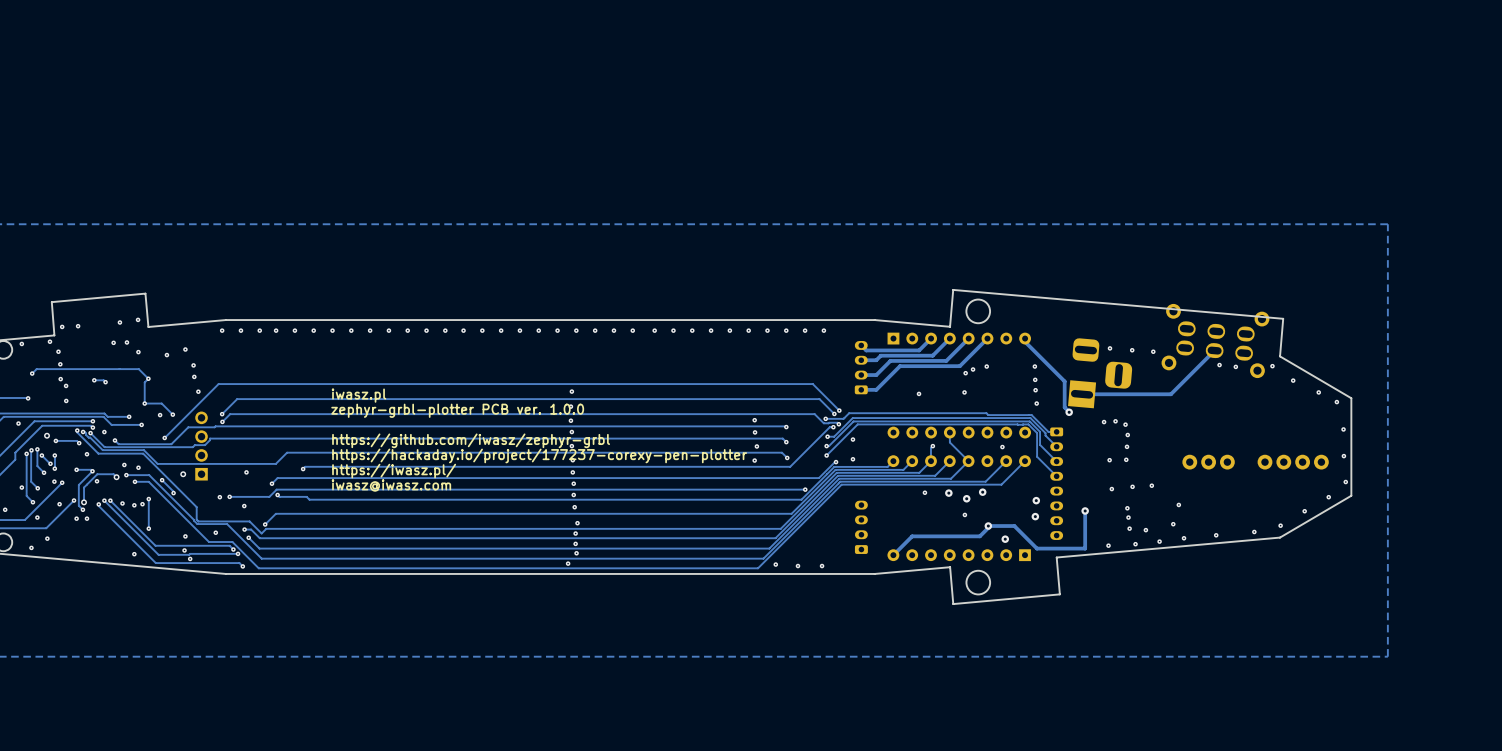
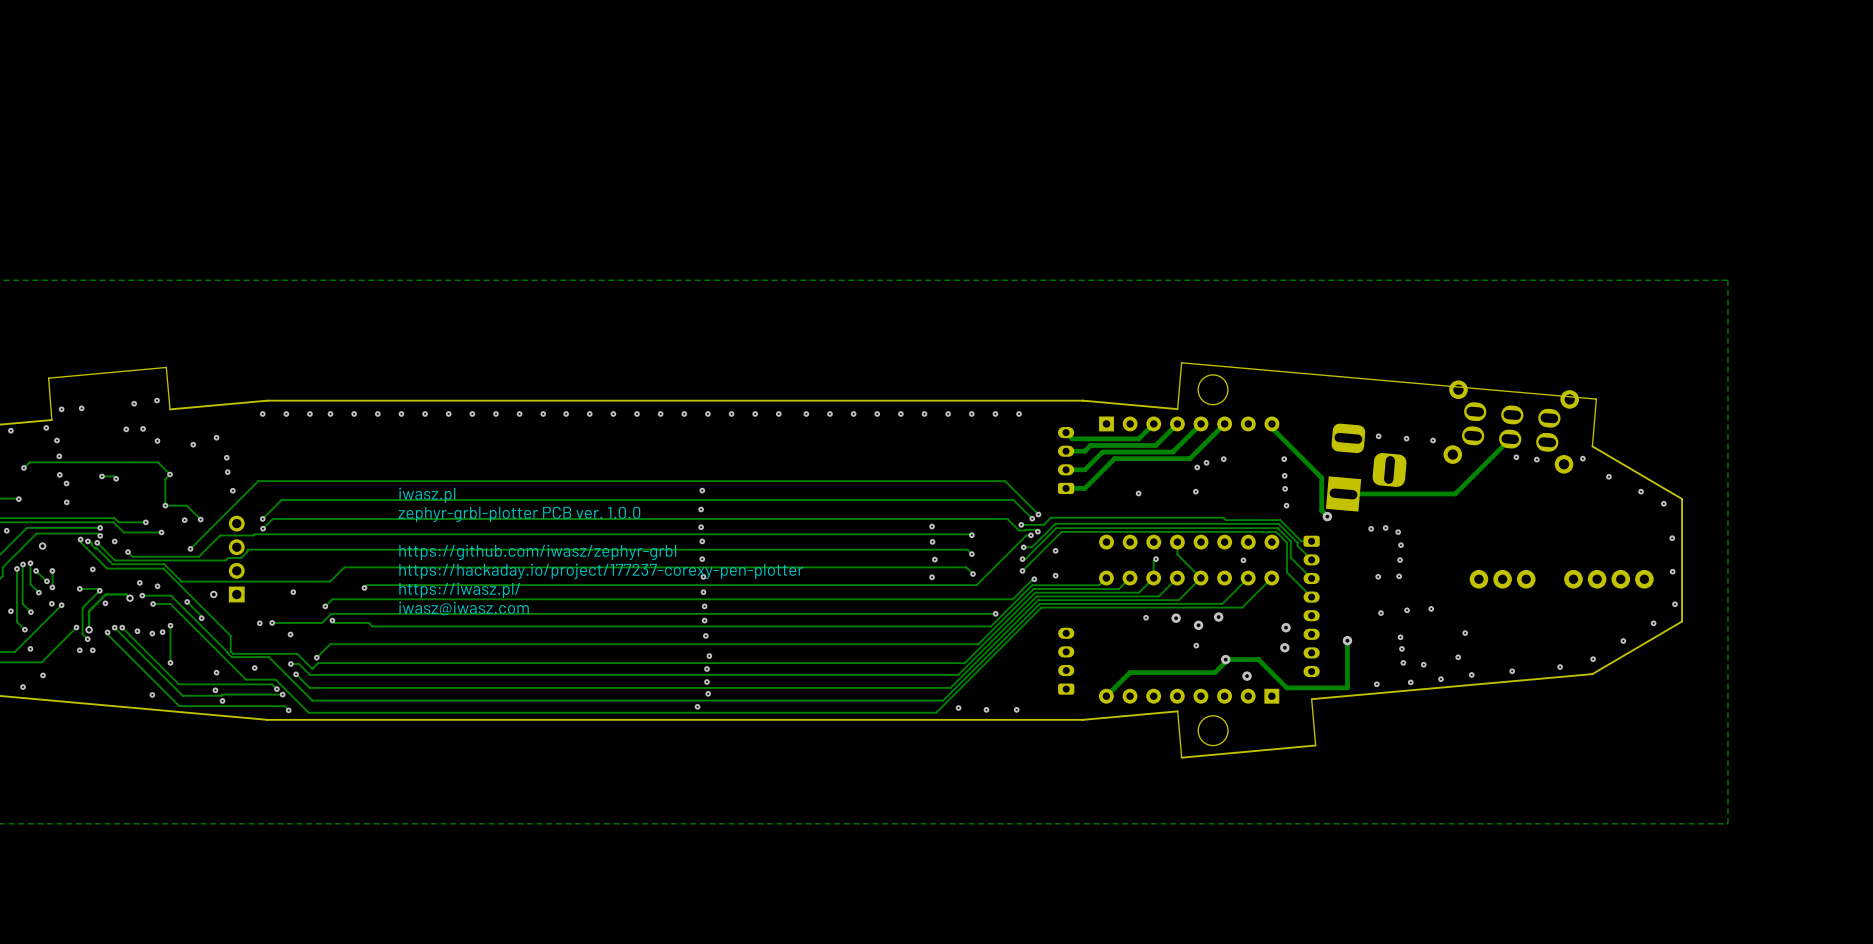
track: (55, 440) (76, 440) (79, 443) -> none
via: (55, 440) -> none
via: (79, 443) -> none
via: (59, 504) -> none

